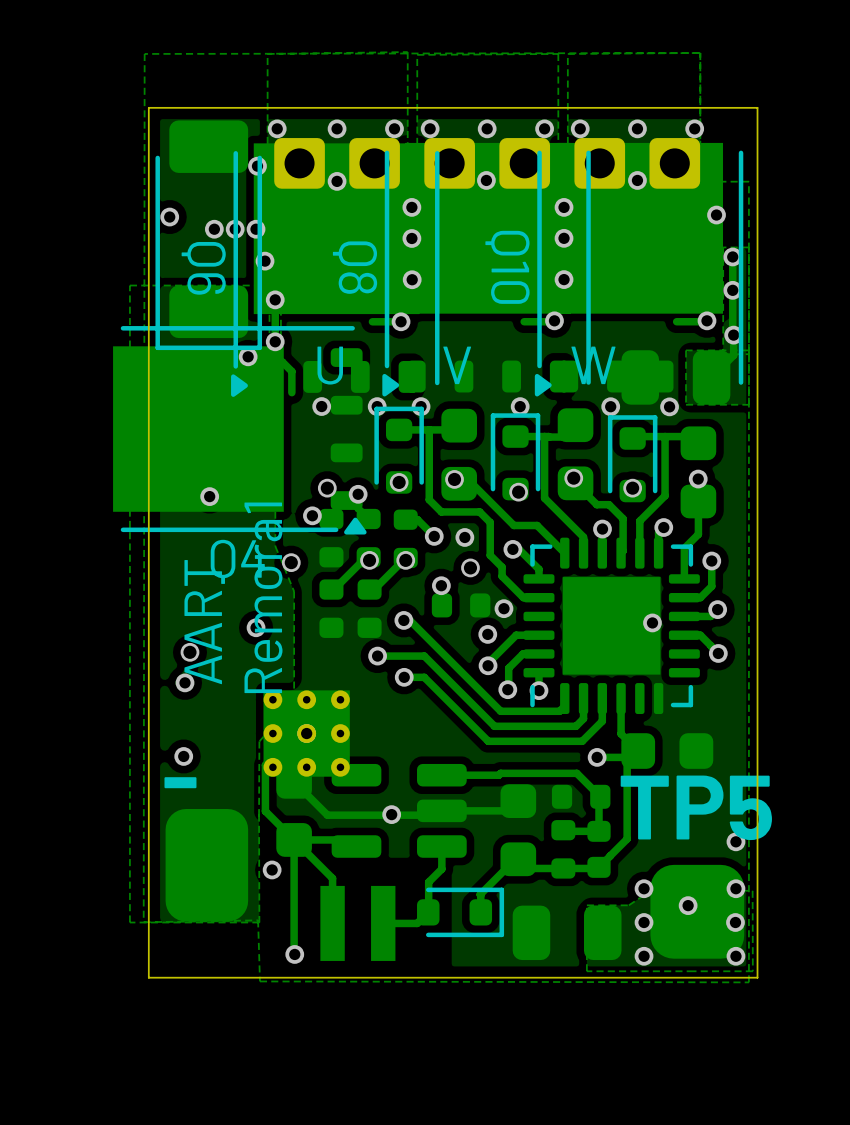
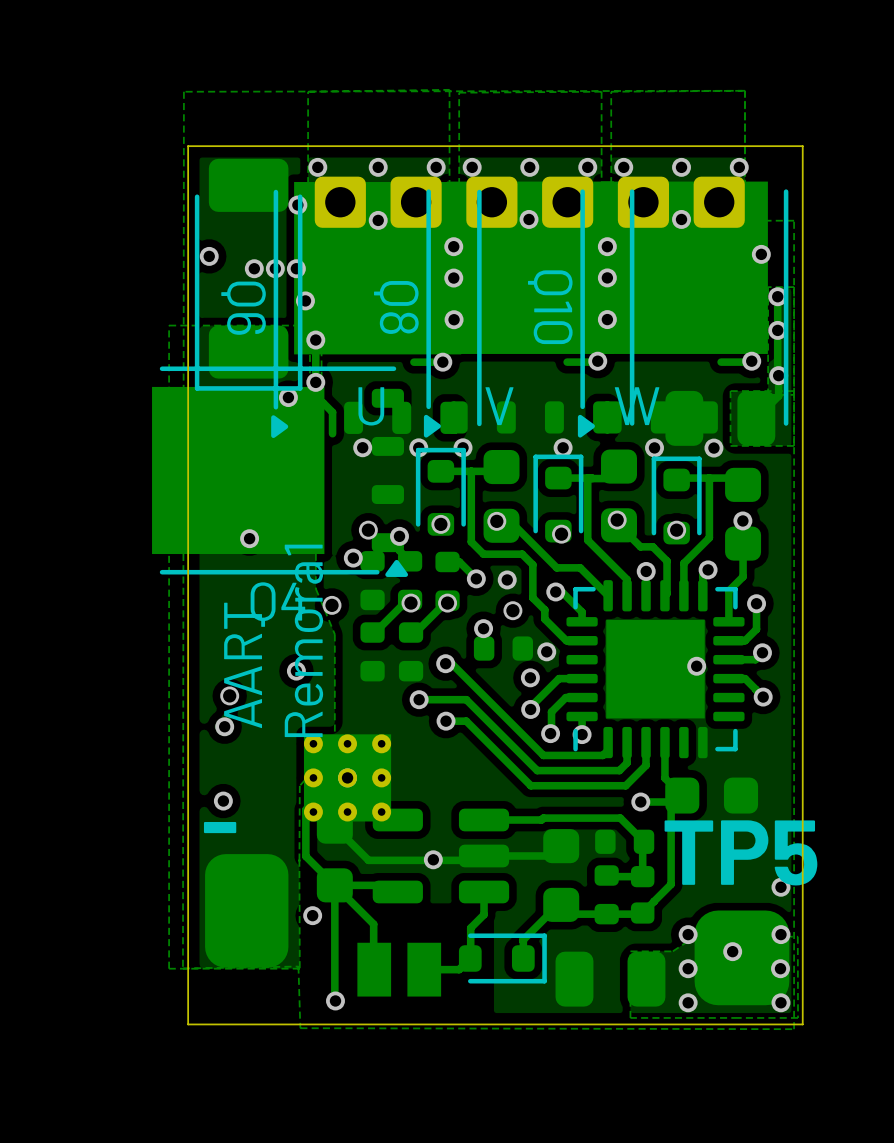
part footprint: [320, 885, 396, 961] -> [357, 942, 442, 997]

